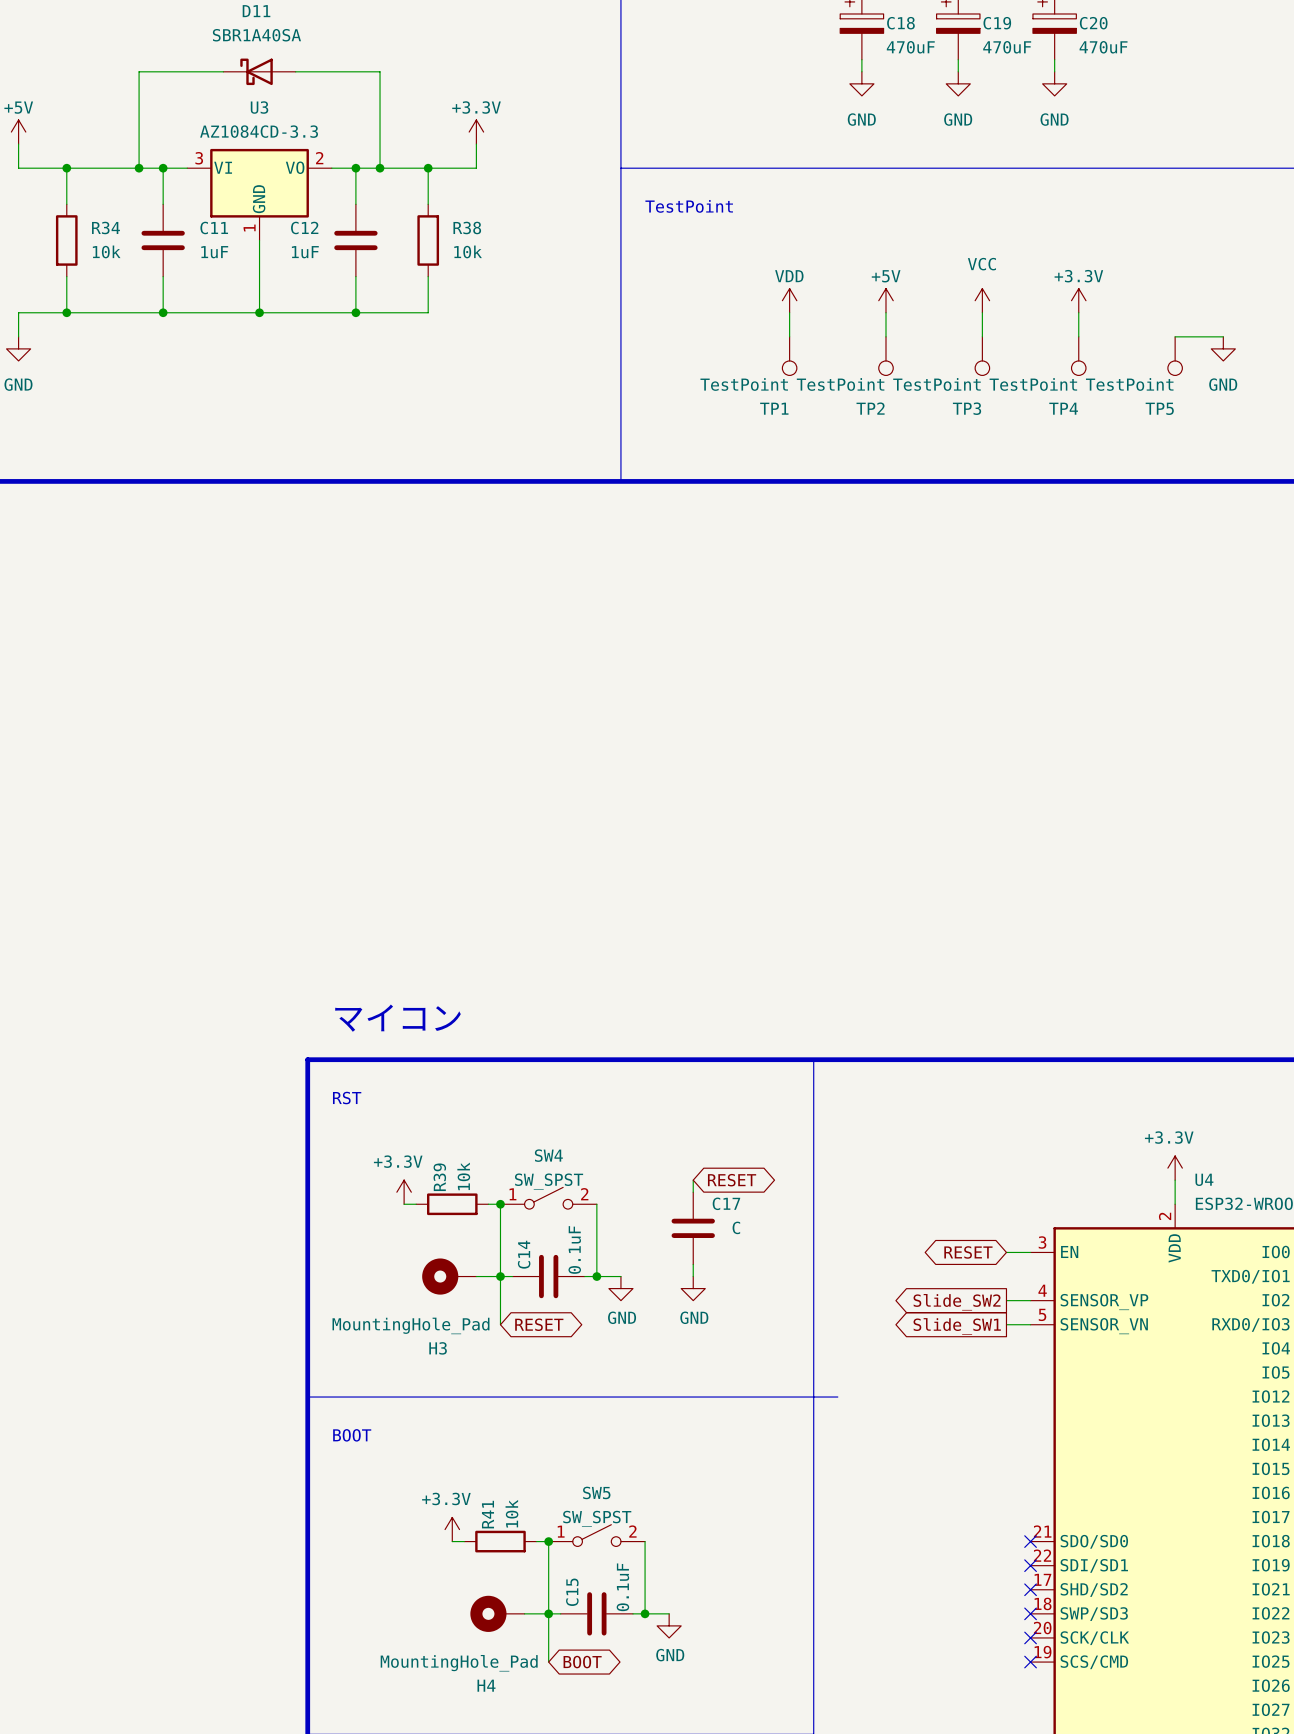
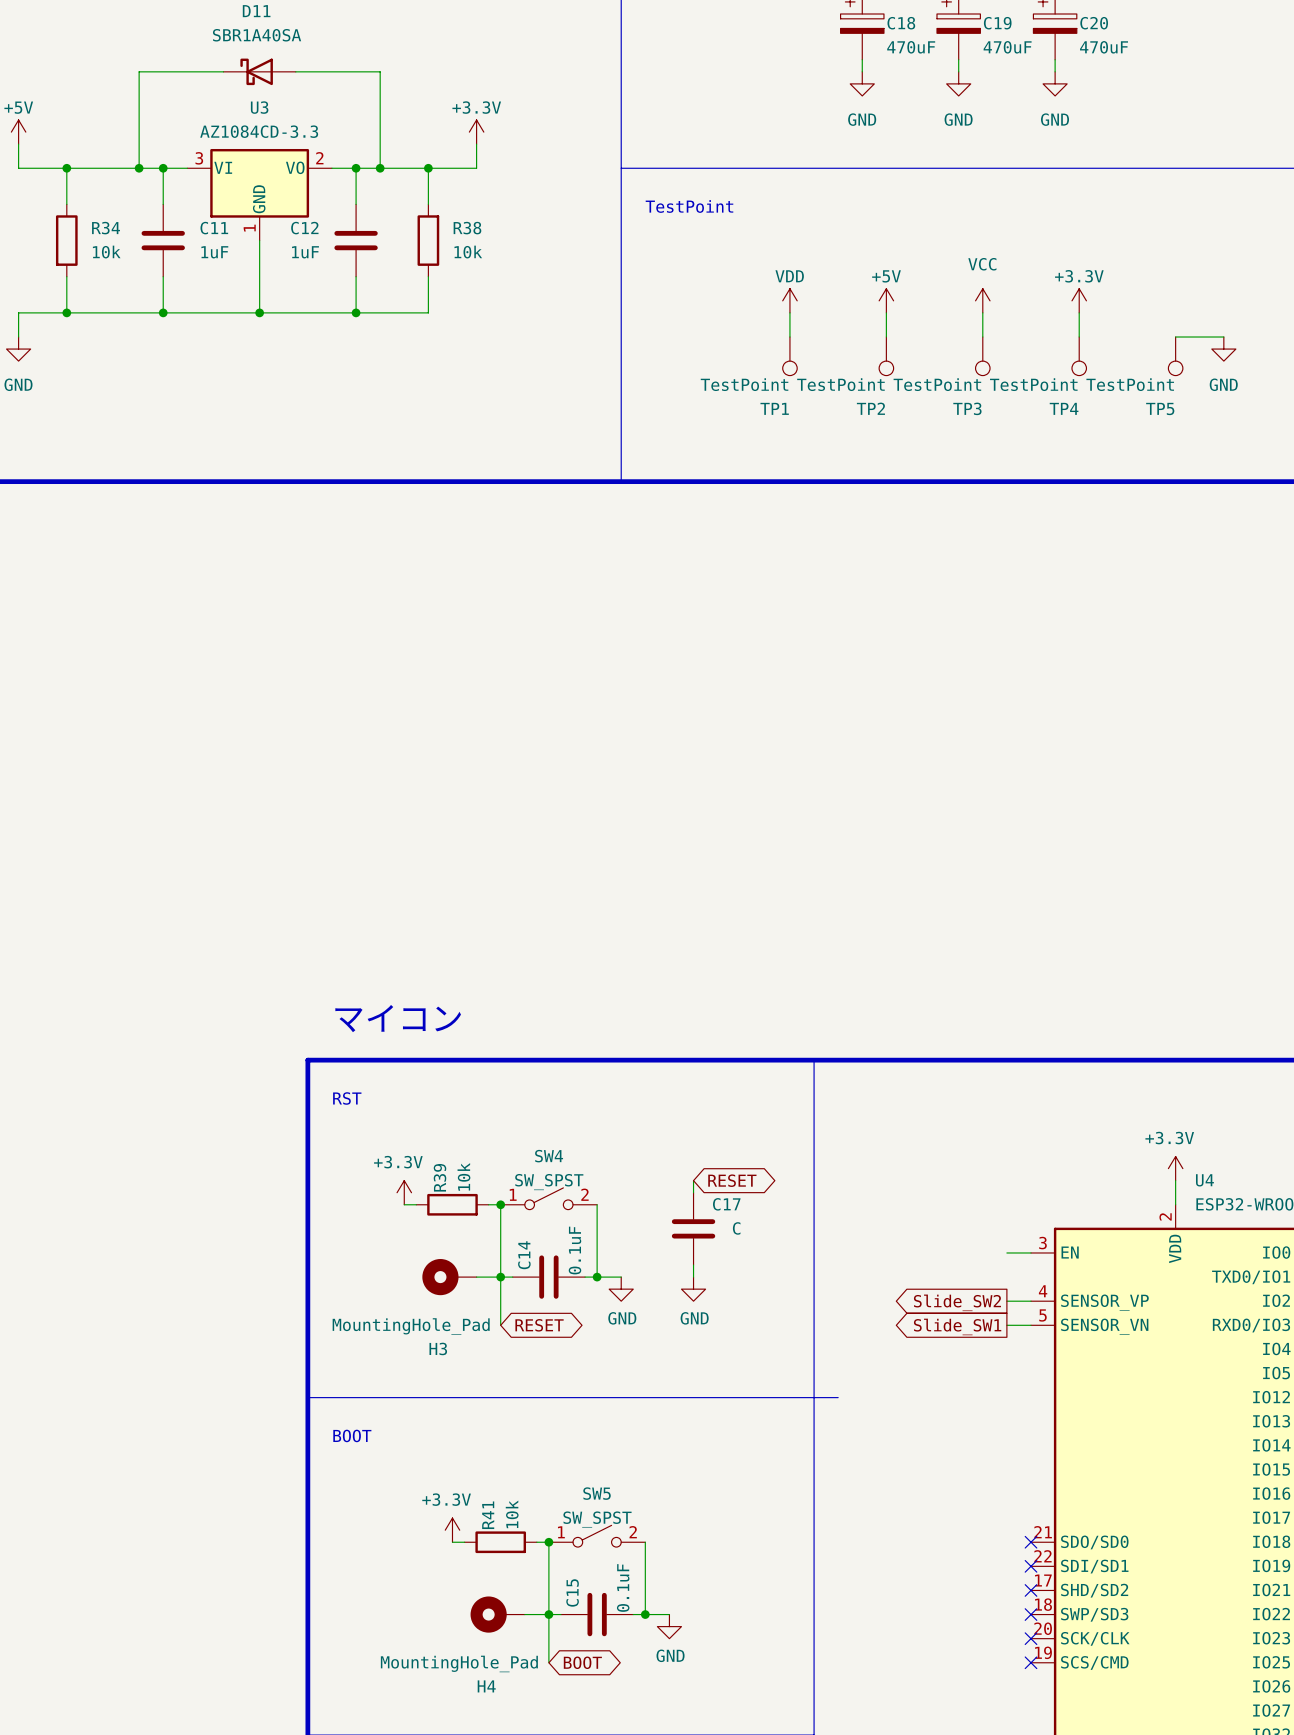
global label: RESET (968, 1252) -> none

